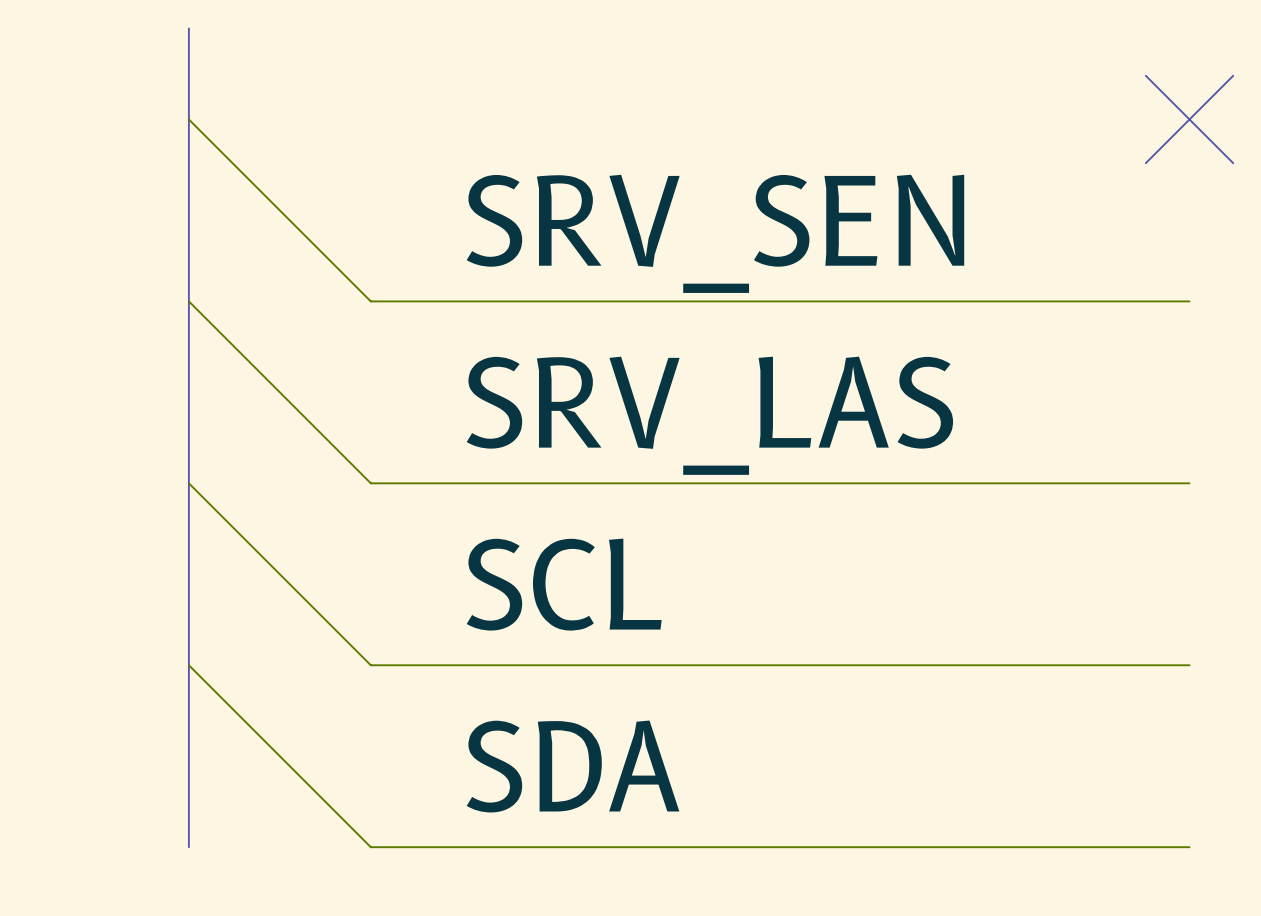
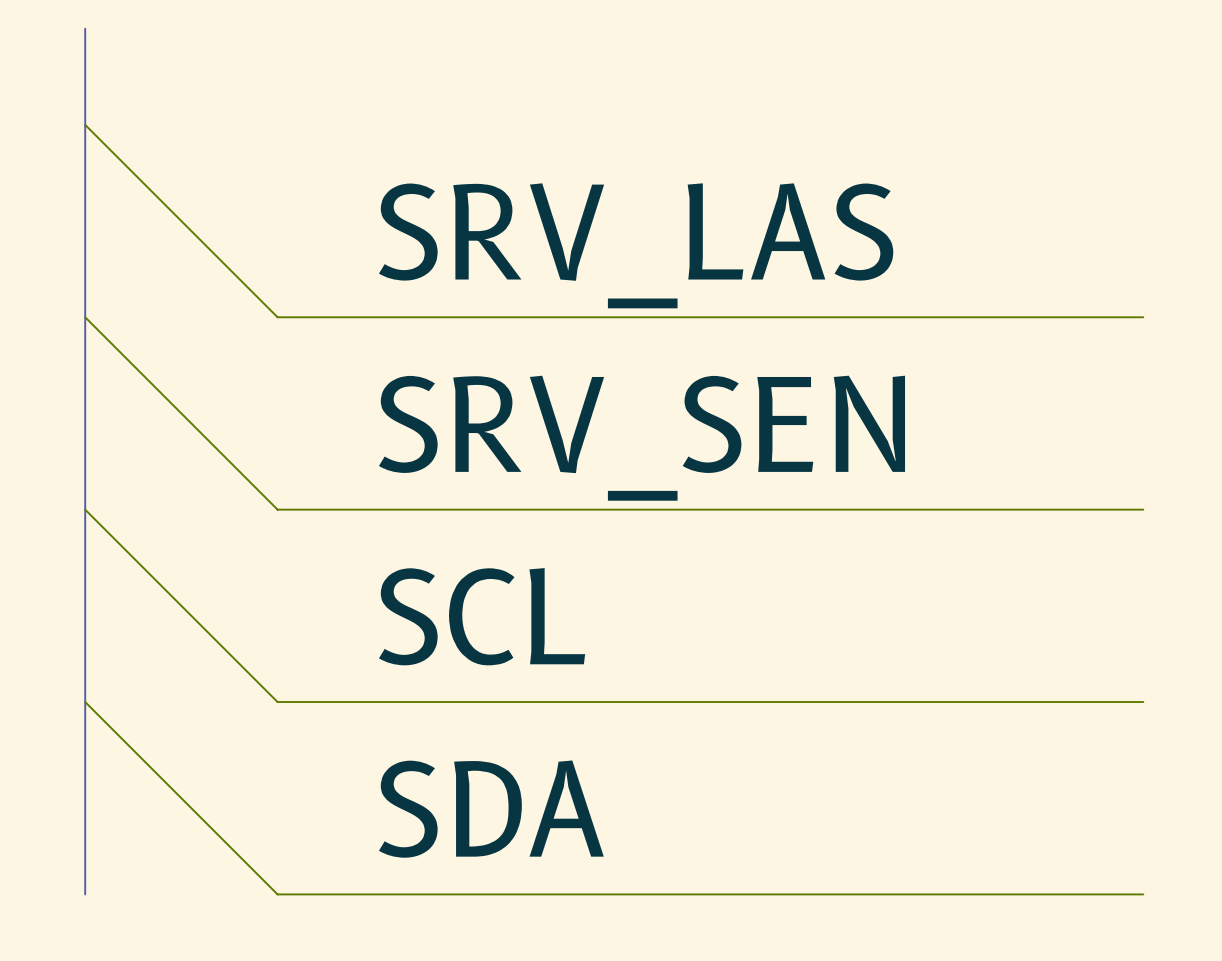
no-connect mark: (1189, 119) -> none
label: SRV_SEN (715, 233) -> SRV_LAS (636, 245)
label: SRV_LAS (709, 415) -> SRV_SEN (641, 438)

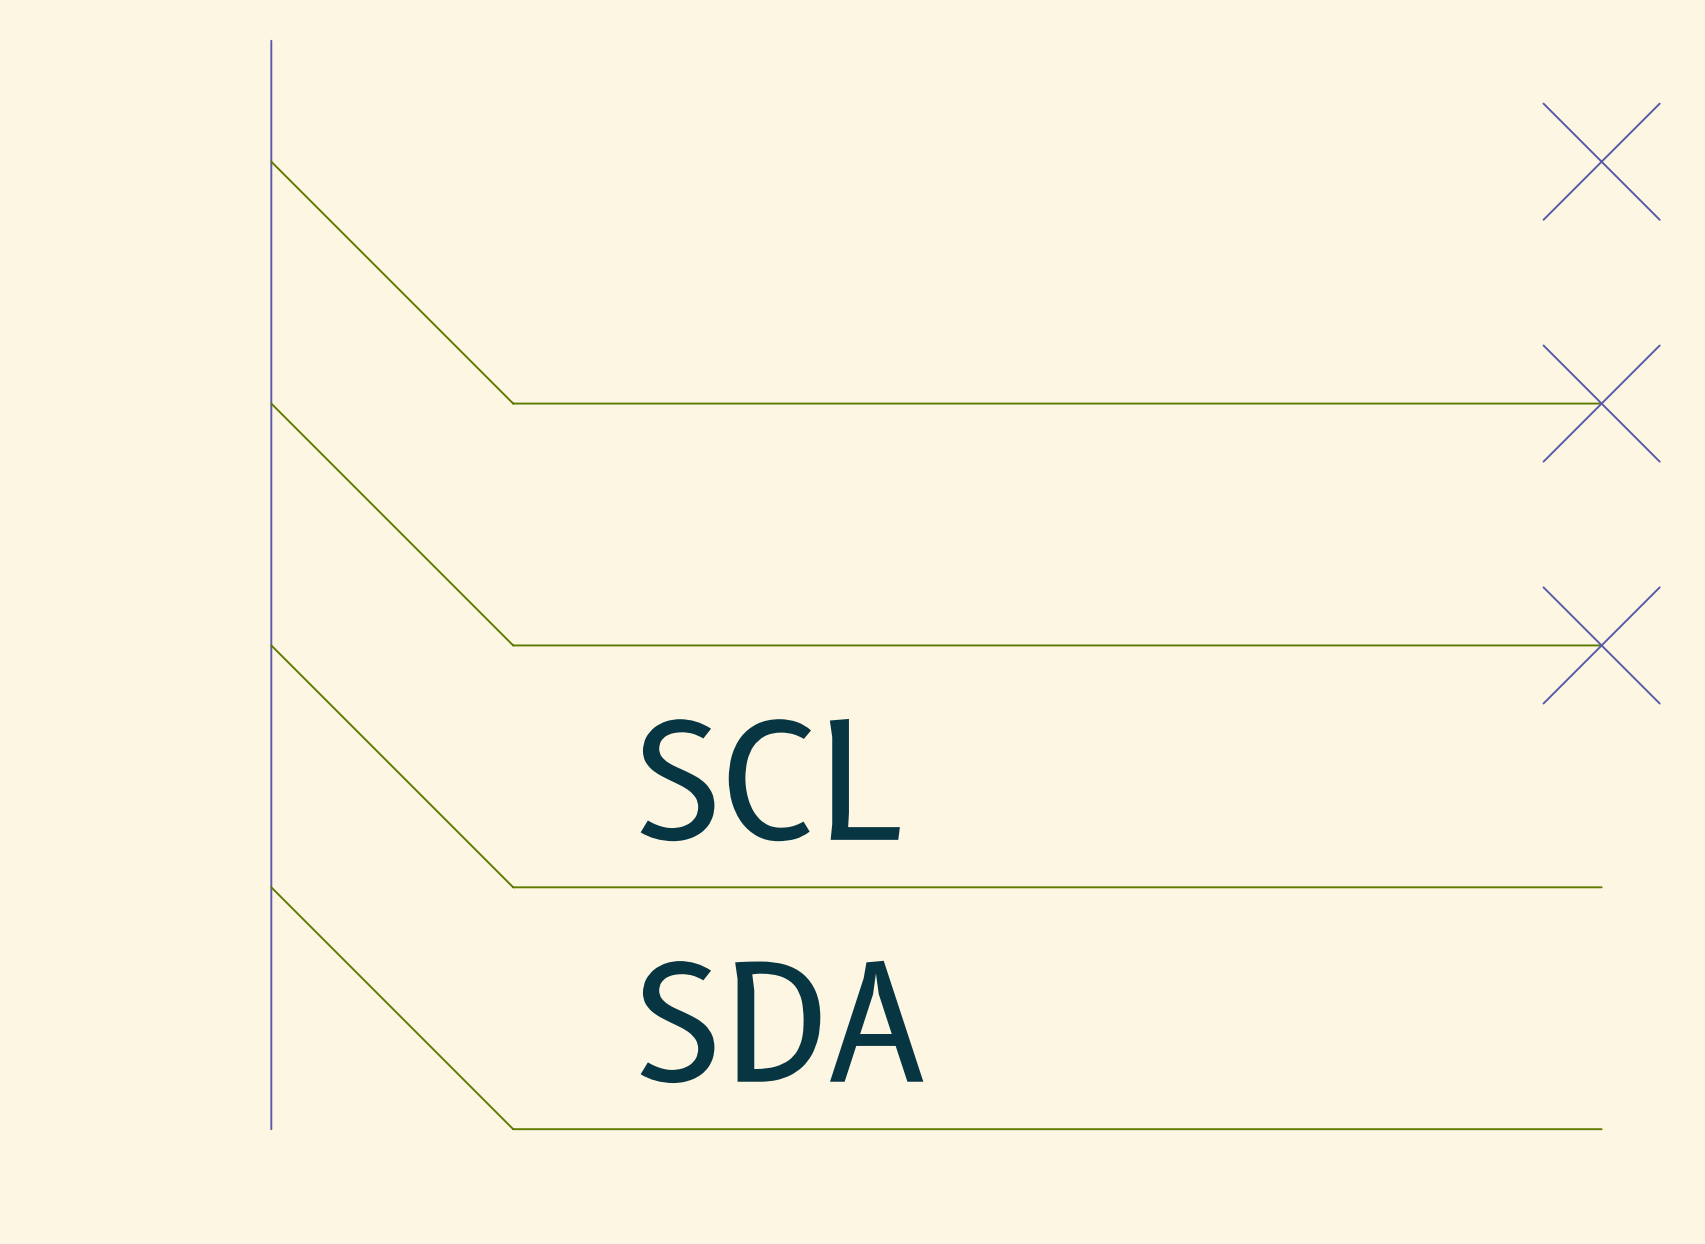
no-connect mark: none -> (1601, 161)
label: SRV_LAS (636, 245) -> none
no-connect mark: none -> (1601, 403)
label: SRV_SEN (641, 438) -> none
no-connect mark: none -> (1601, 645)

